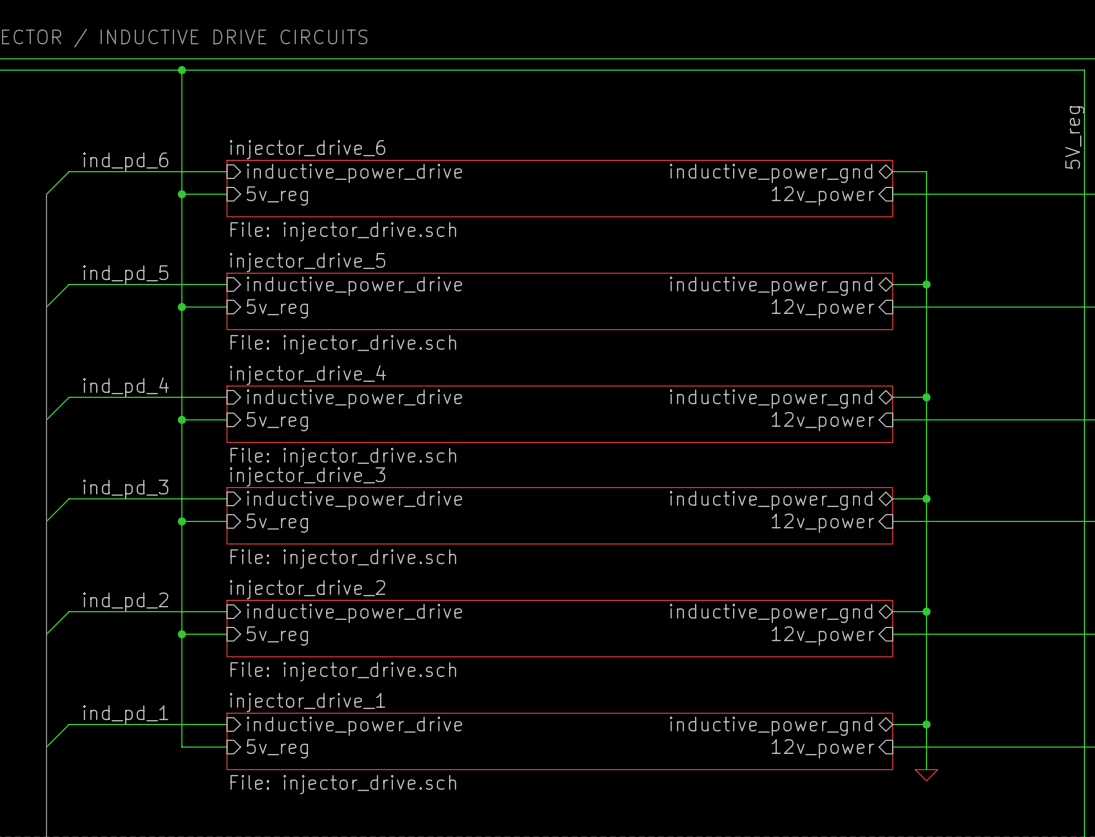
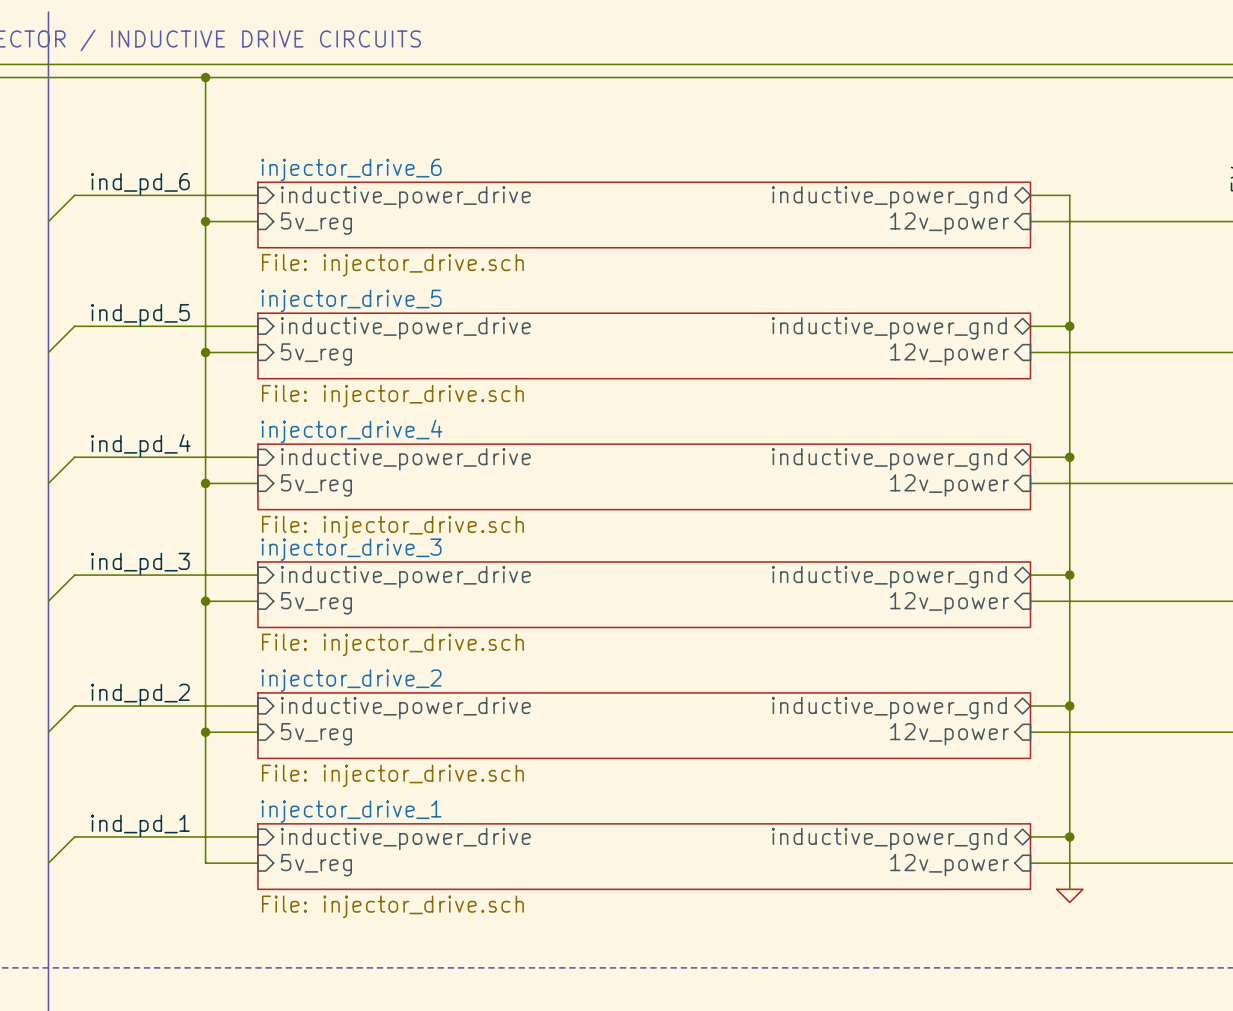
bus: none -> (48, 12) (48, 221)

